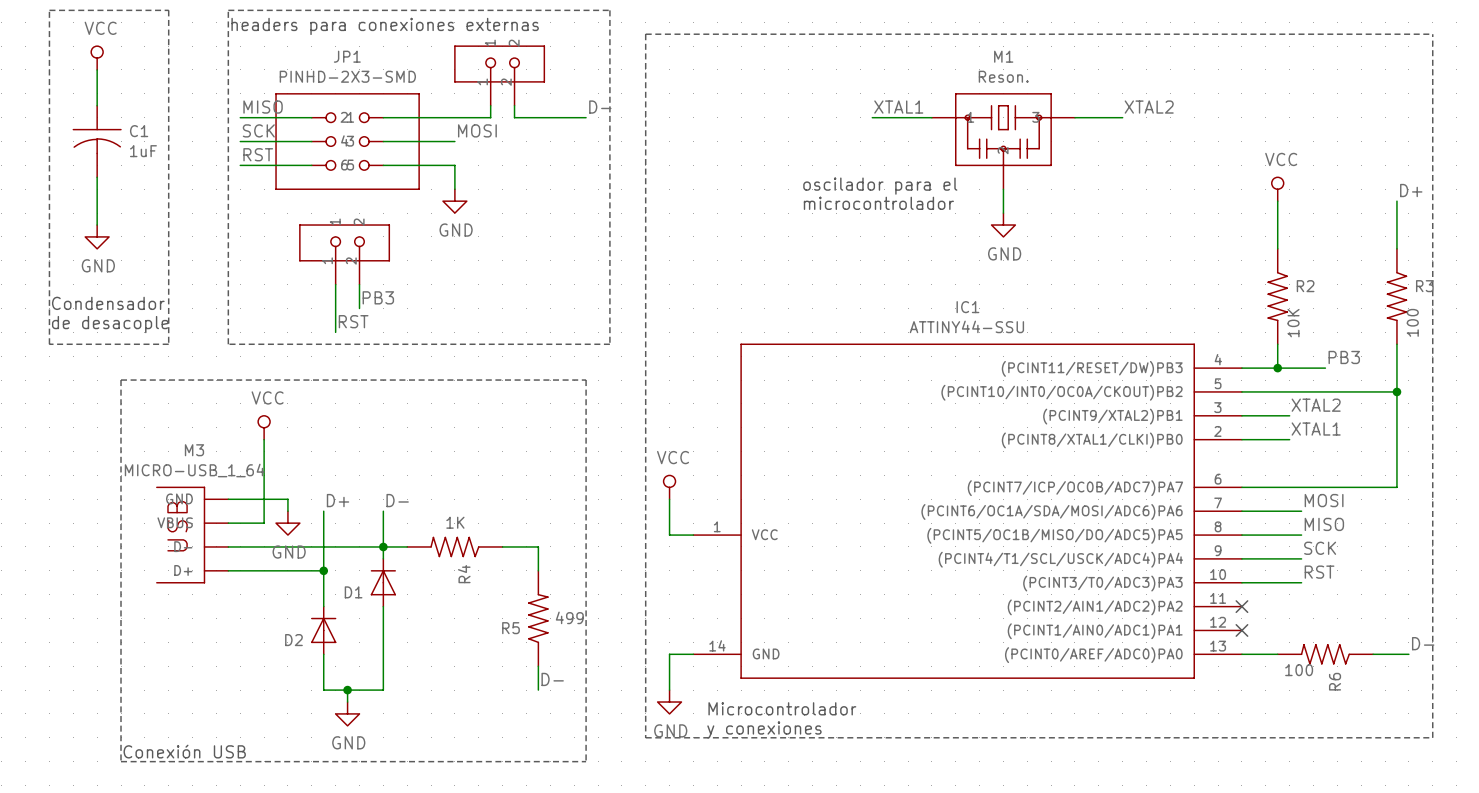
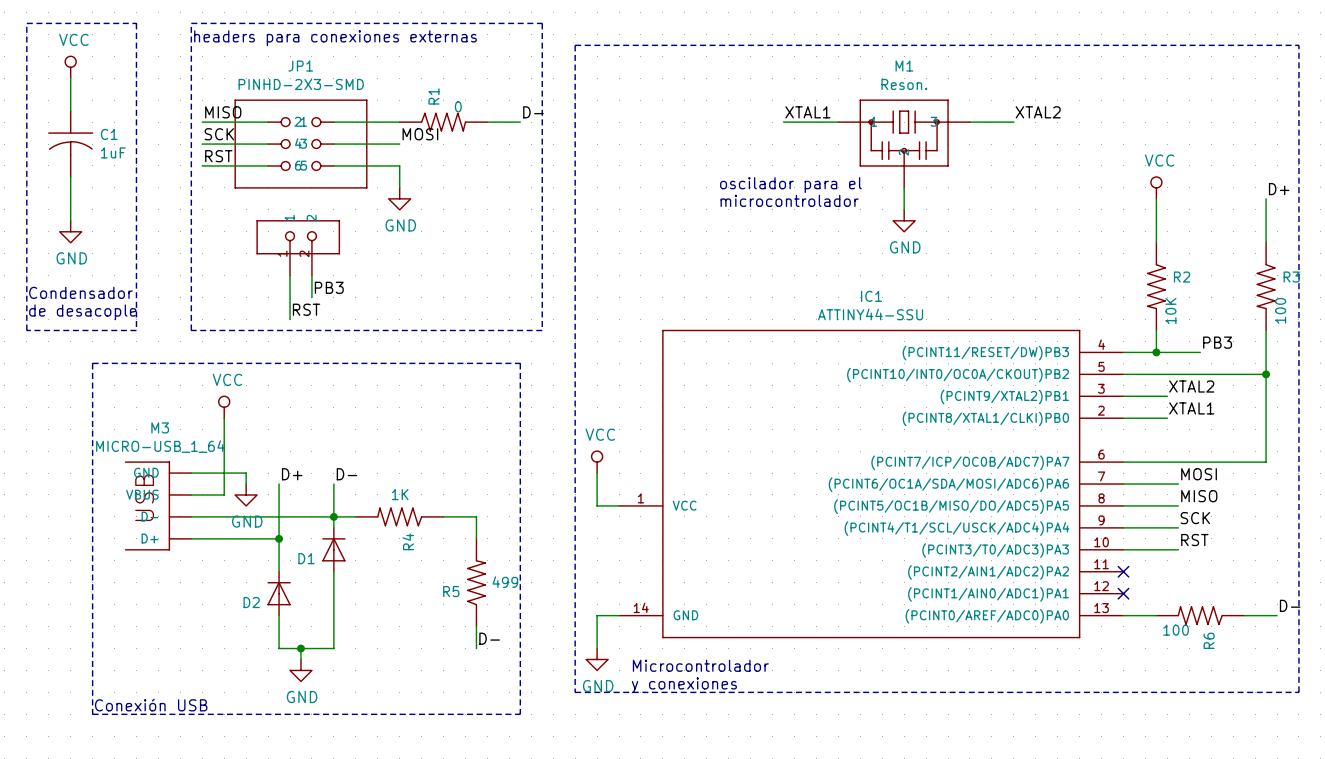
part: (499, 75) -> none
wire: (490, 105) (490, 117) (454, 117) -> none
R1: none -> 0 (443, 122)

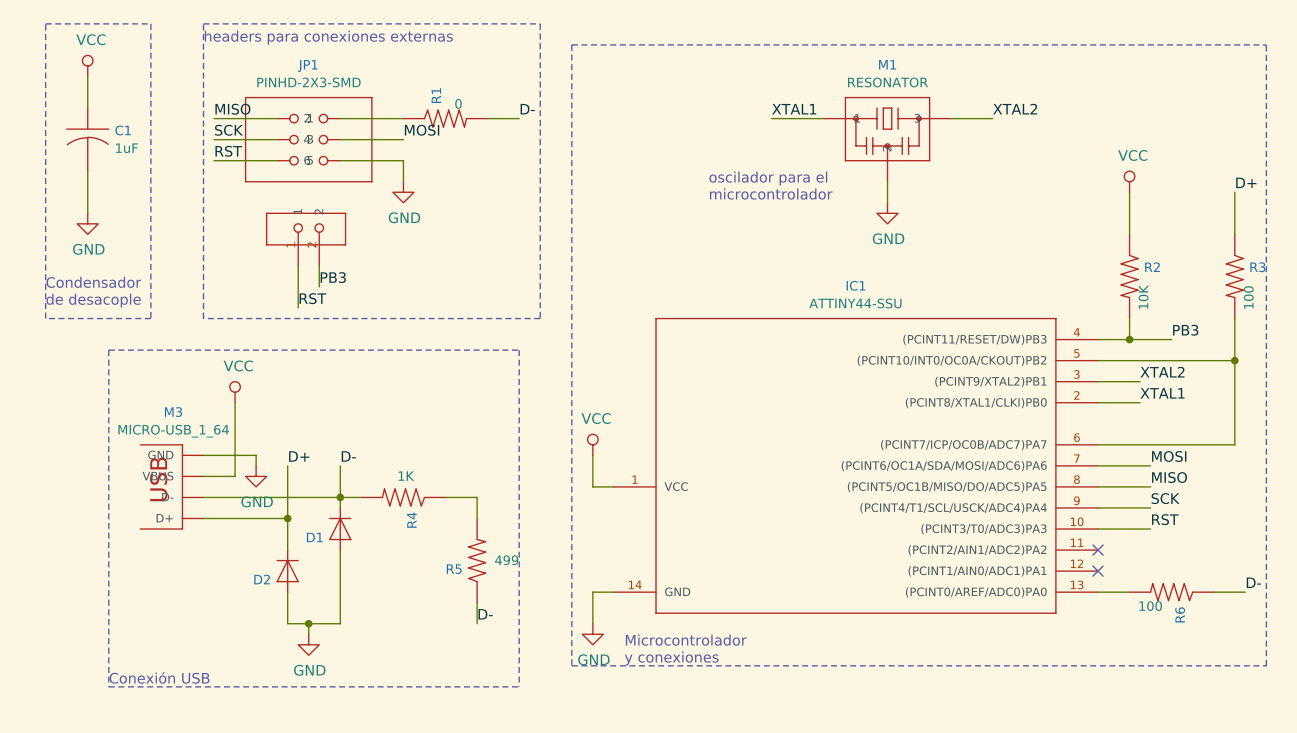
M1 value: Reson. (904, 84) -> RESONATOR (887, 82)

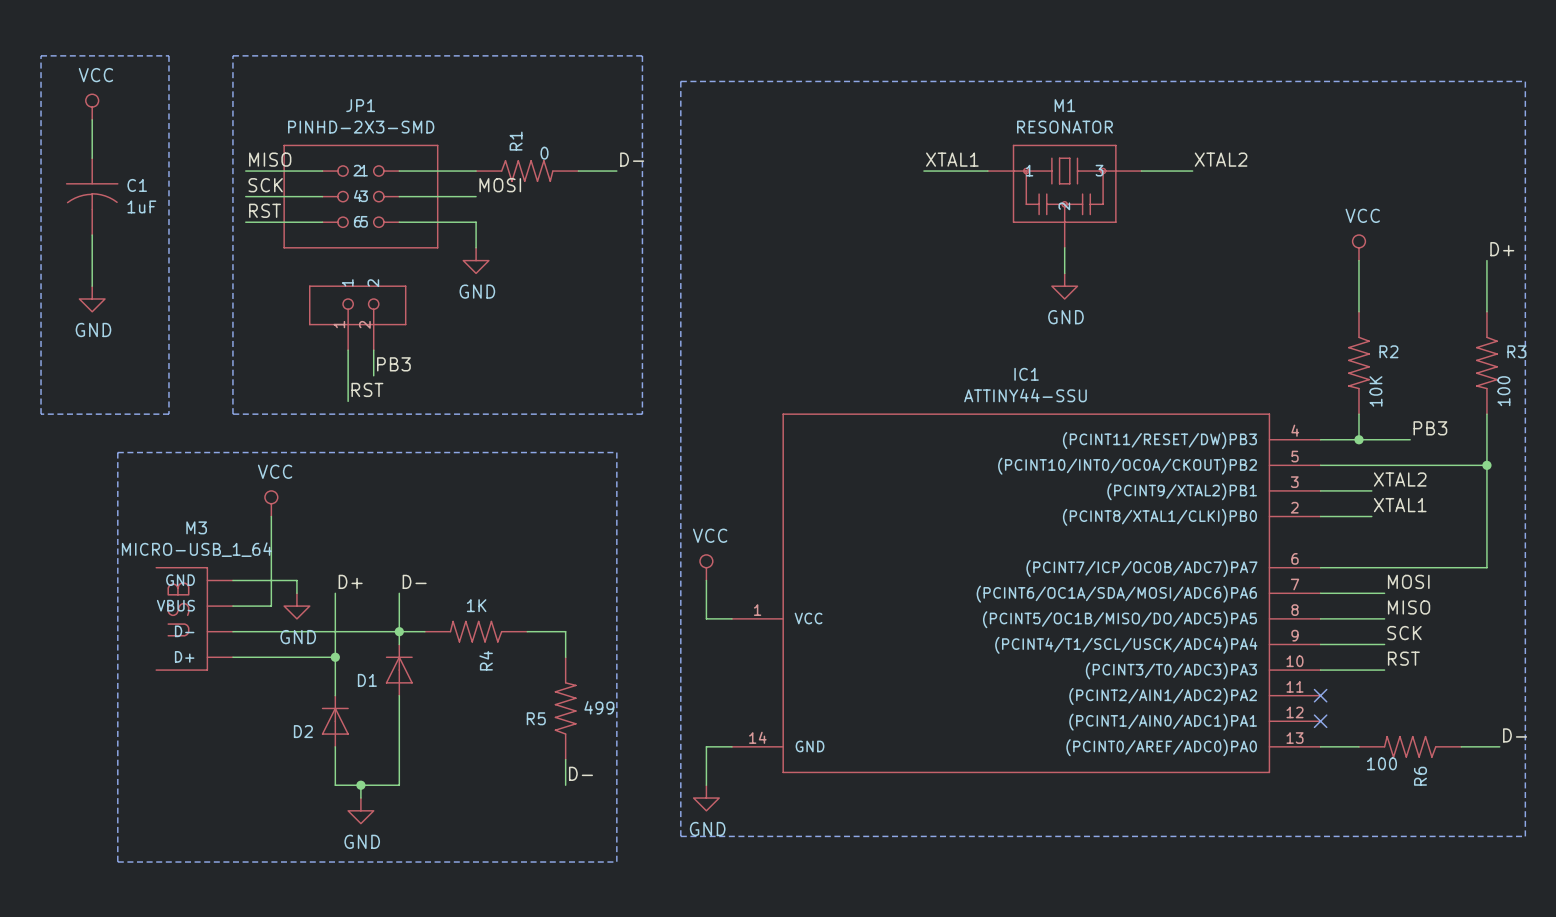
text: headers para conexiones externas (328, 37) -> none
text: oscilador para el (768, 178) -> none
text: microcontrolador (771, 194) -> none
text: Condensador (93, 282) -> none
text: de desacople (93, 300) -> none
text: Microcontrolador (686, 640) -> none
text: y conexiones (671, 658) -> none
text: Conexión USB (159, 677) -> none

